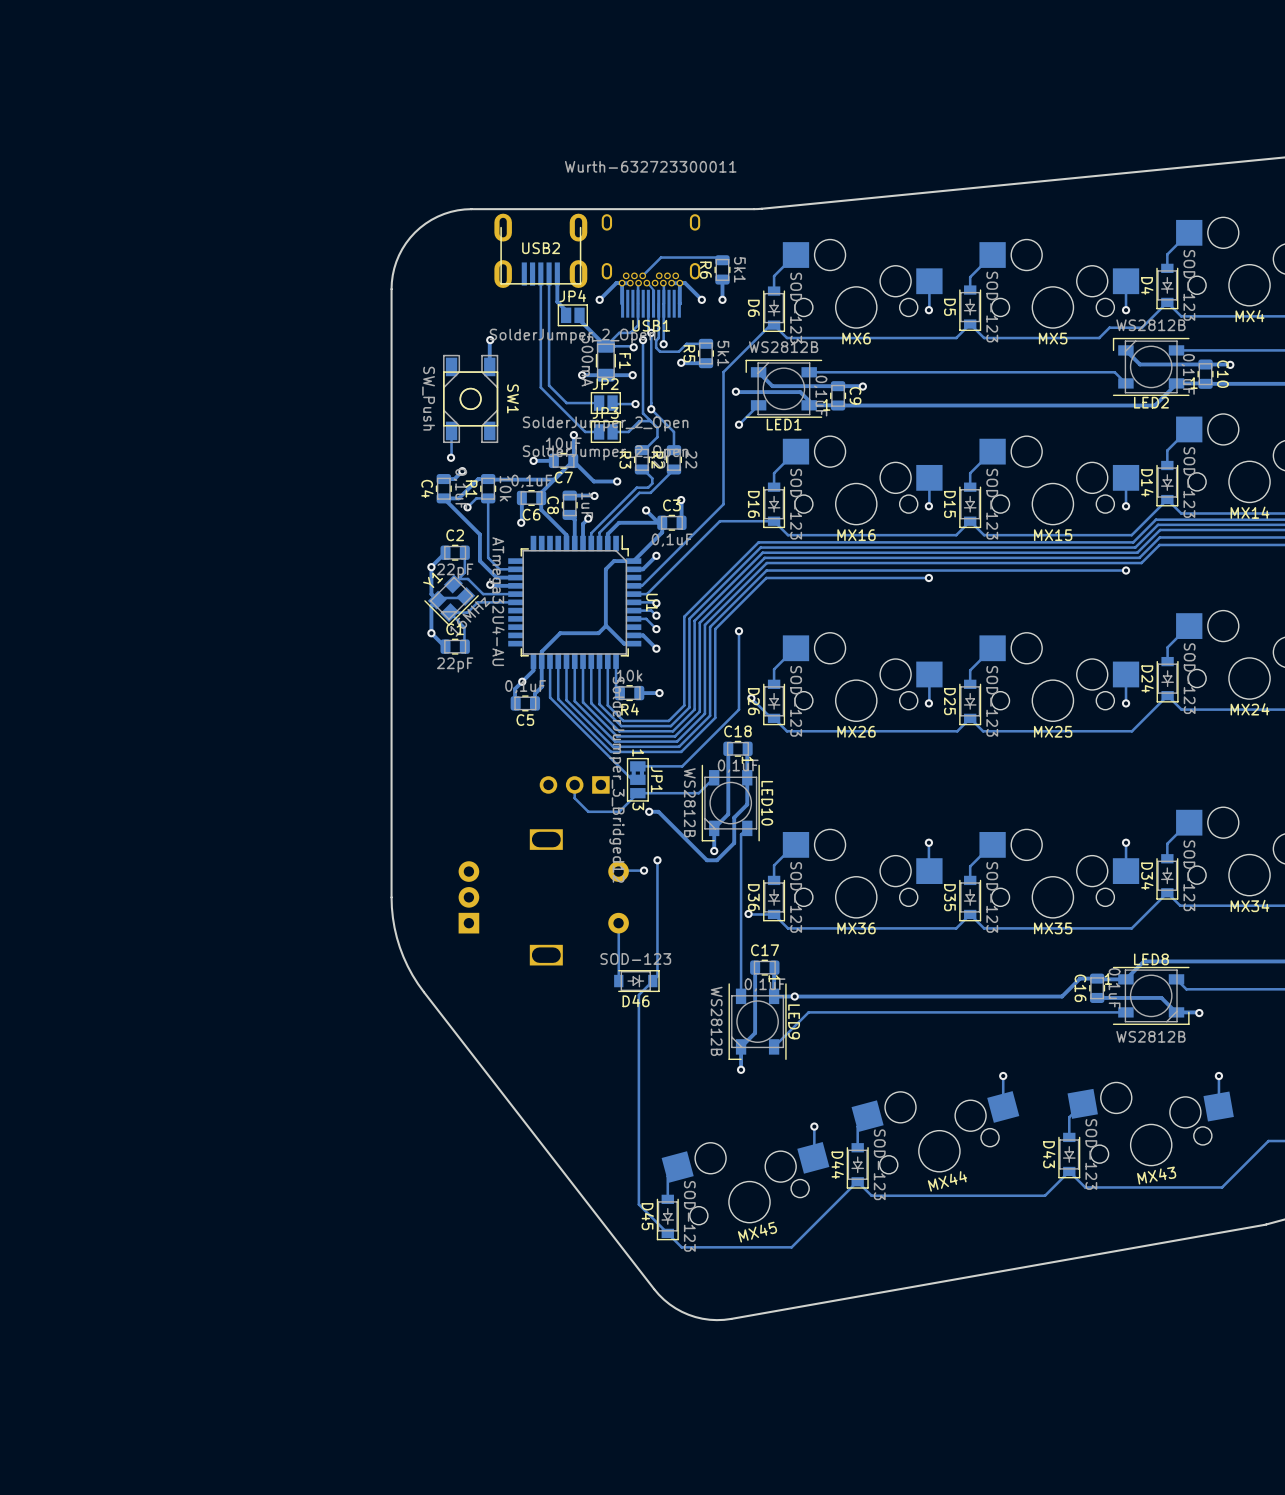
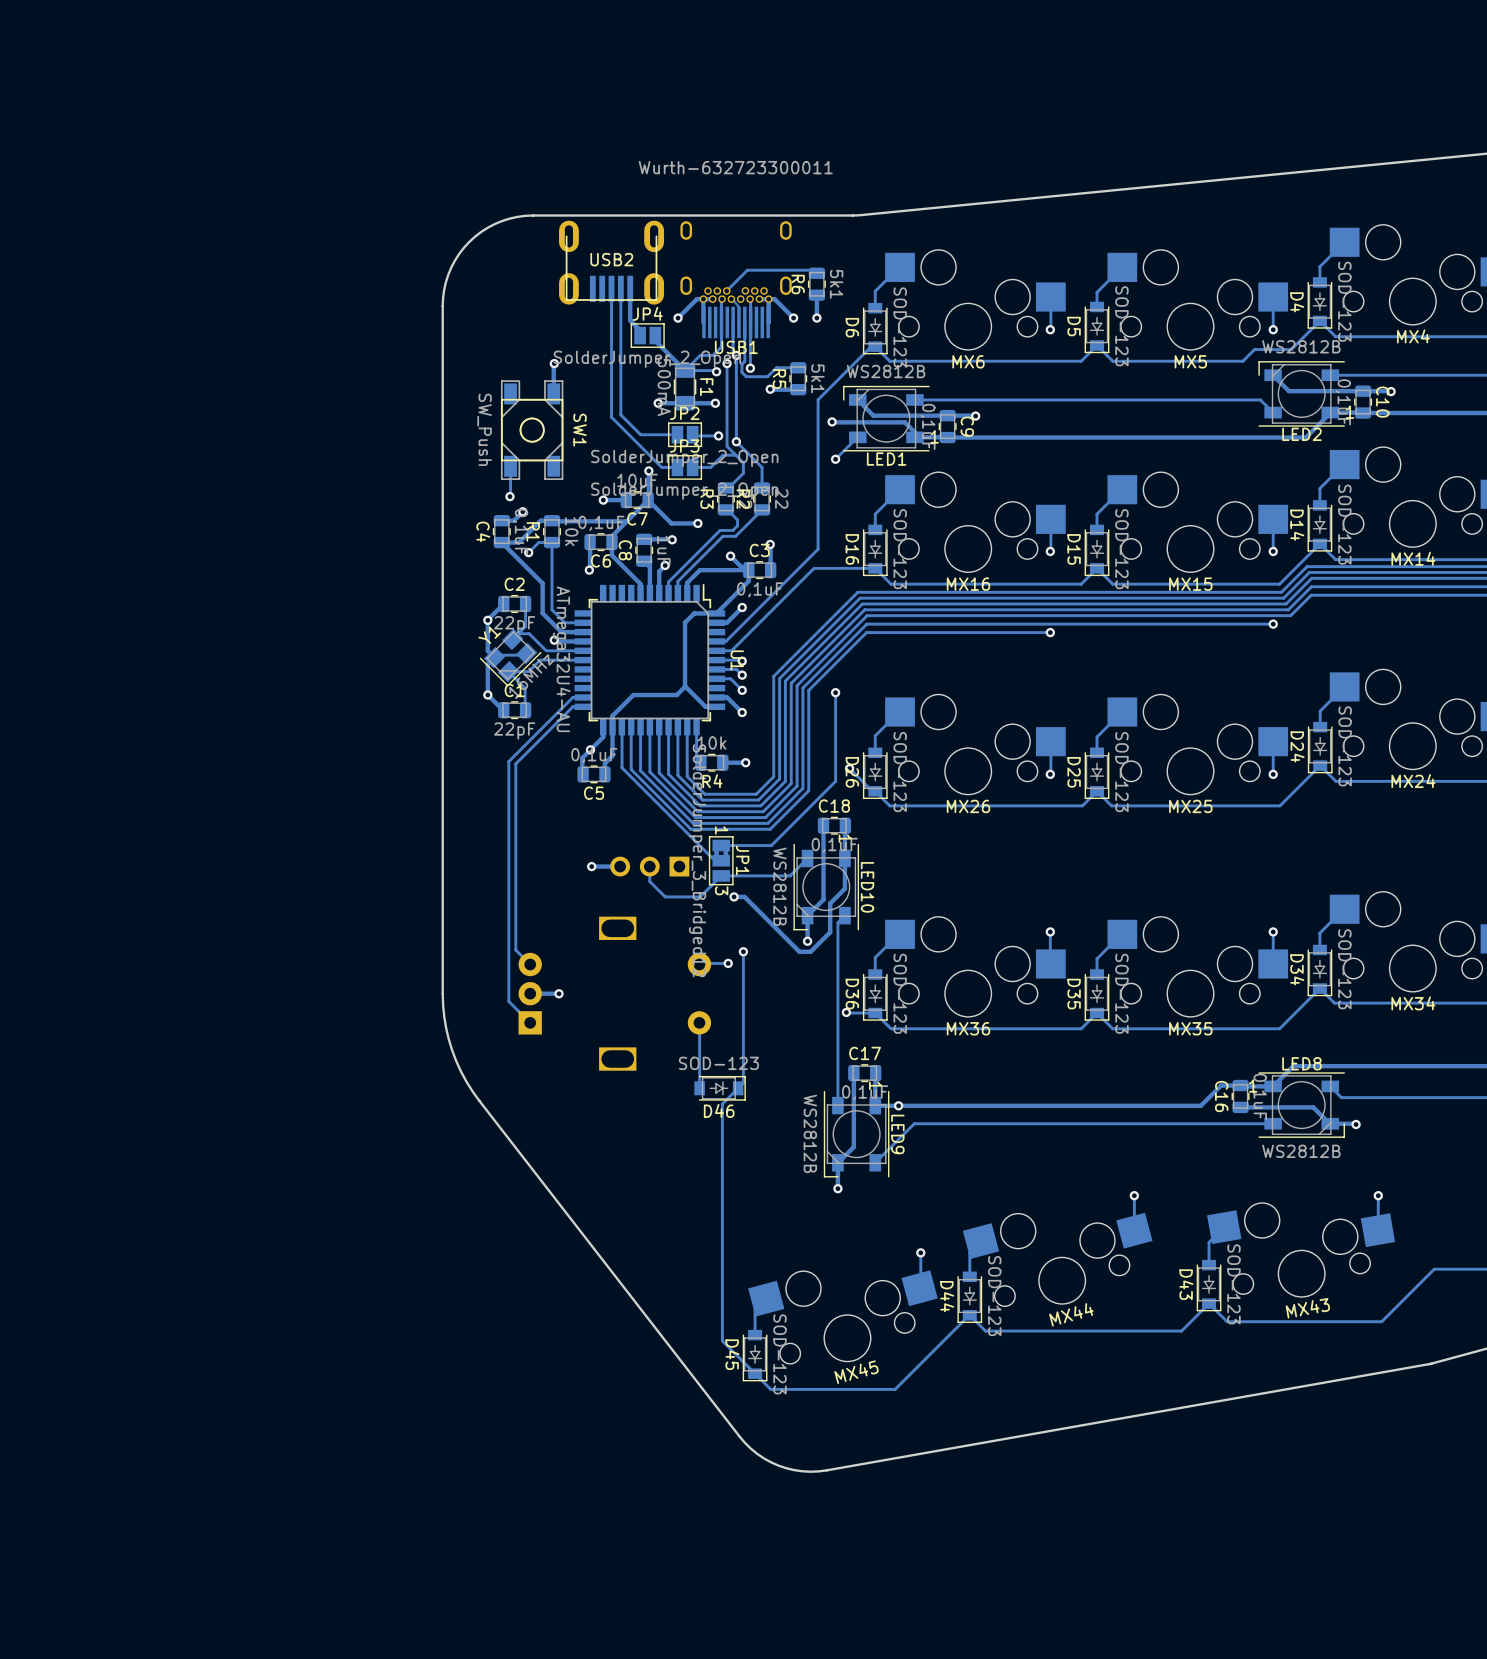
track: none -> (583, 697) (572, 697) (508, 761) (508, 1001) (530, 1022)
track: none -> (583, 706) (572, 706) (515, 763) (515, 950) (530, 964)
via: none -> (591, 866)
track: none -> (620, 866) (591, 866)
track: none -> (558, 993) (530, 993)
via: none -> (559, 993)

